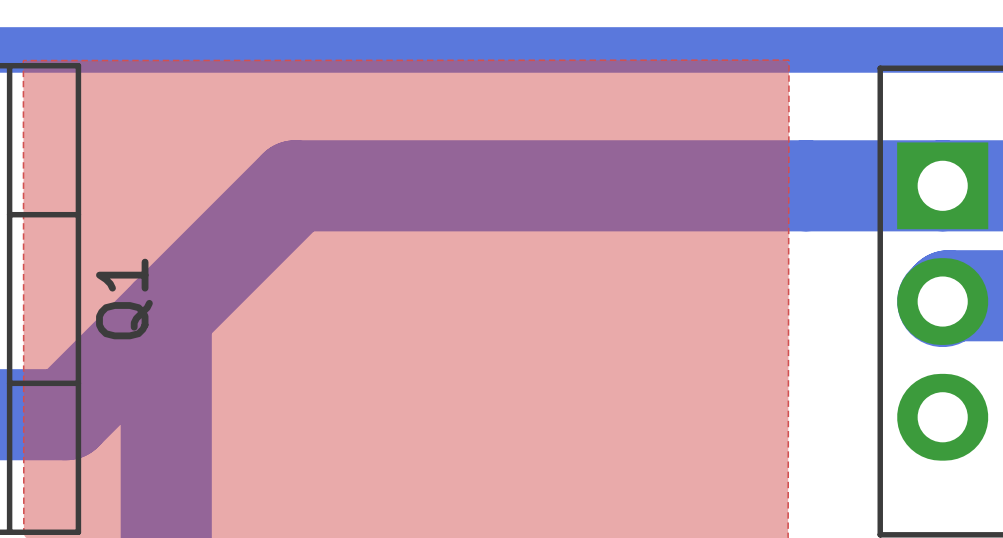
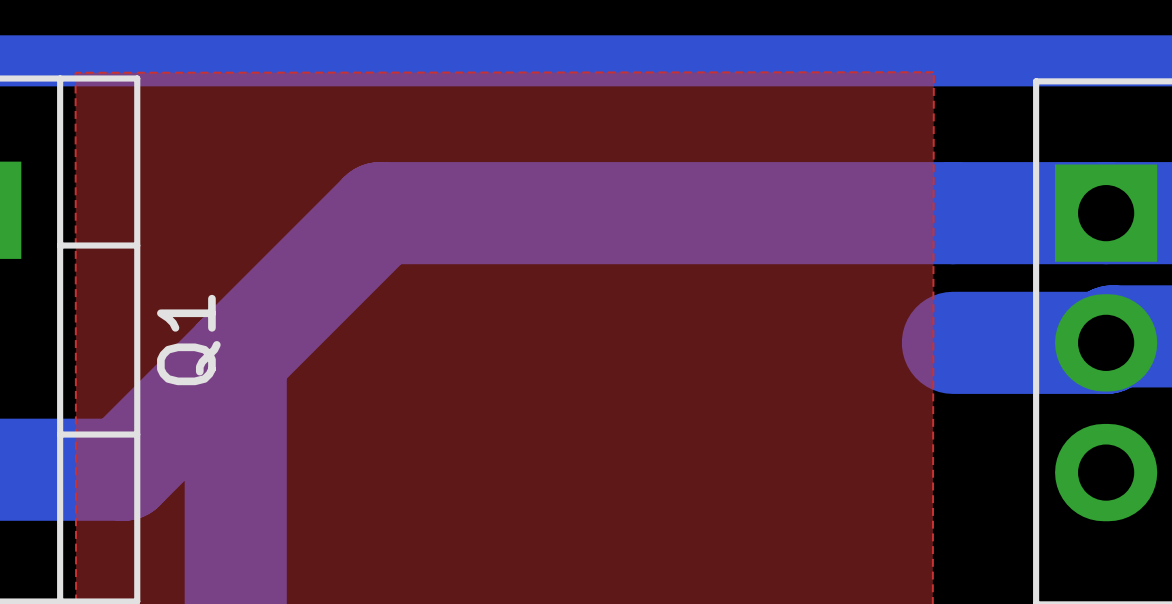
bottom track: none -> (952, 342) (1106, 342)

